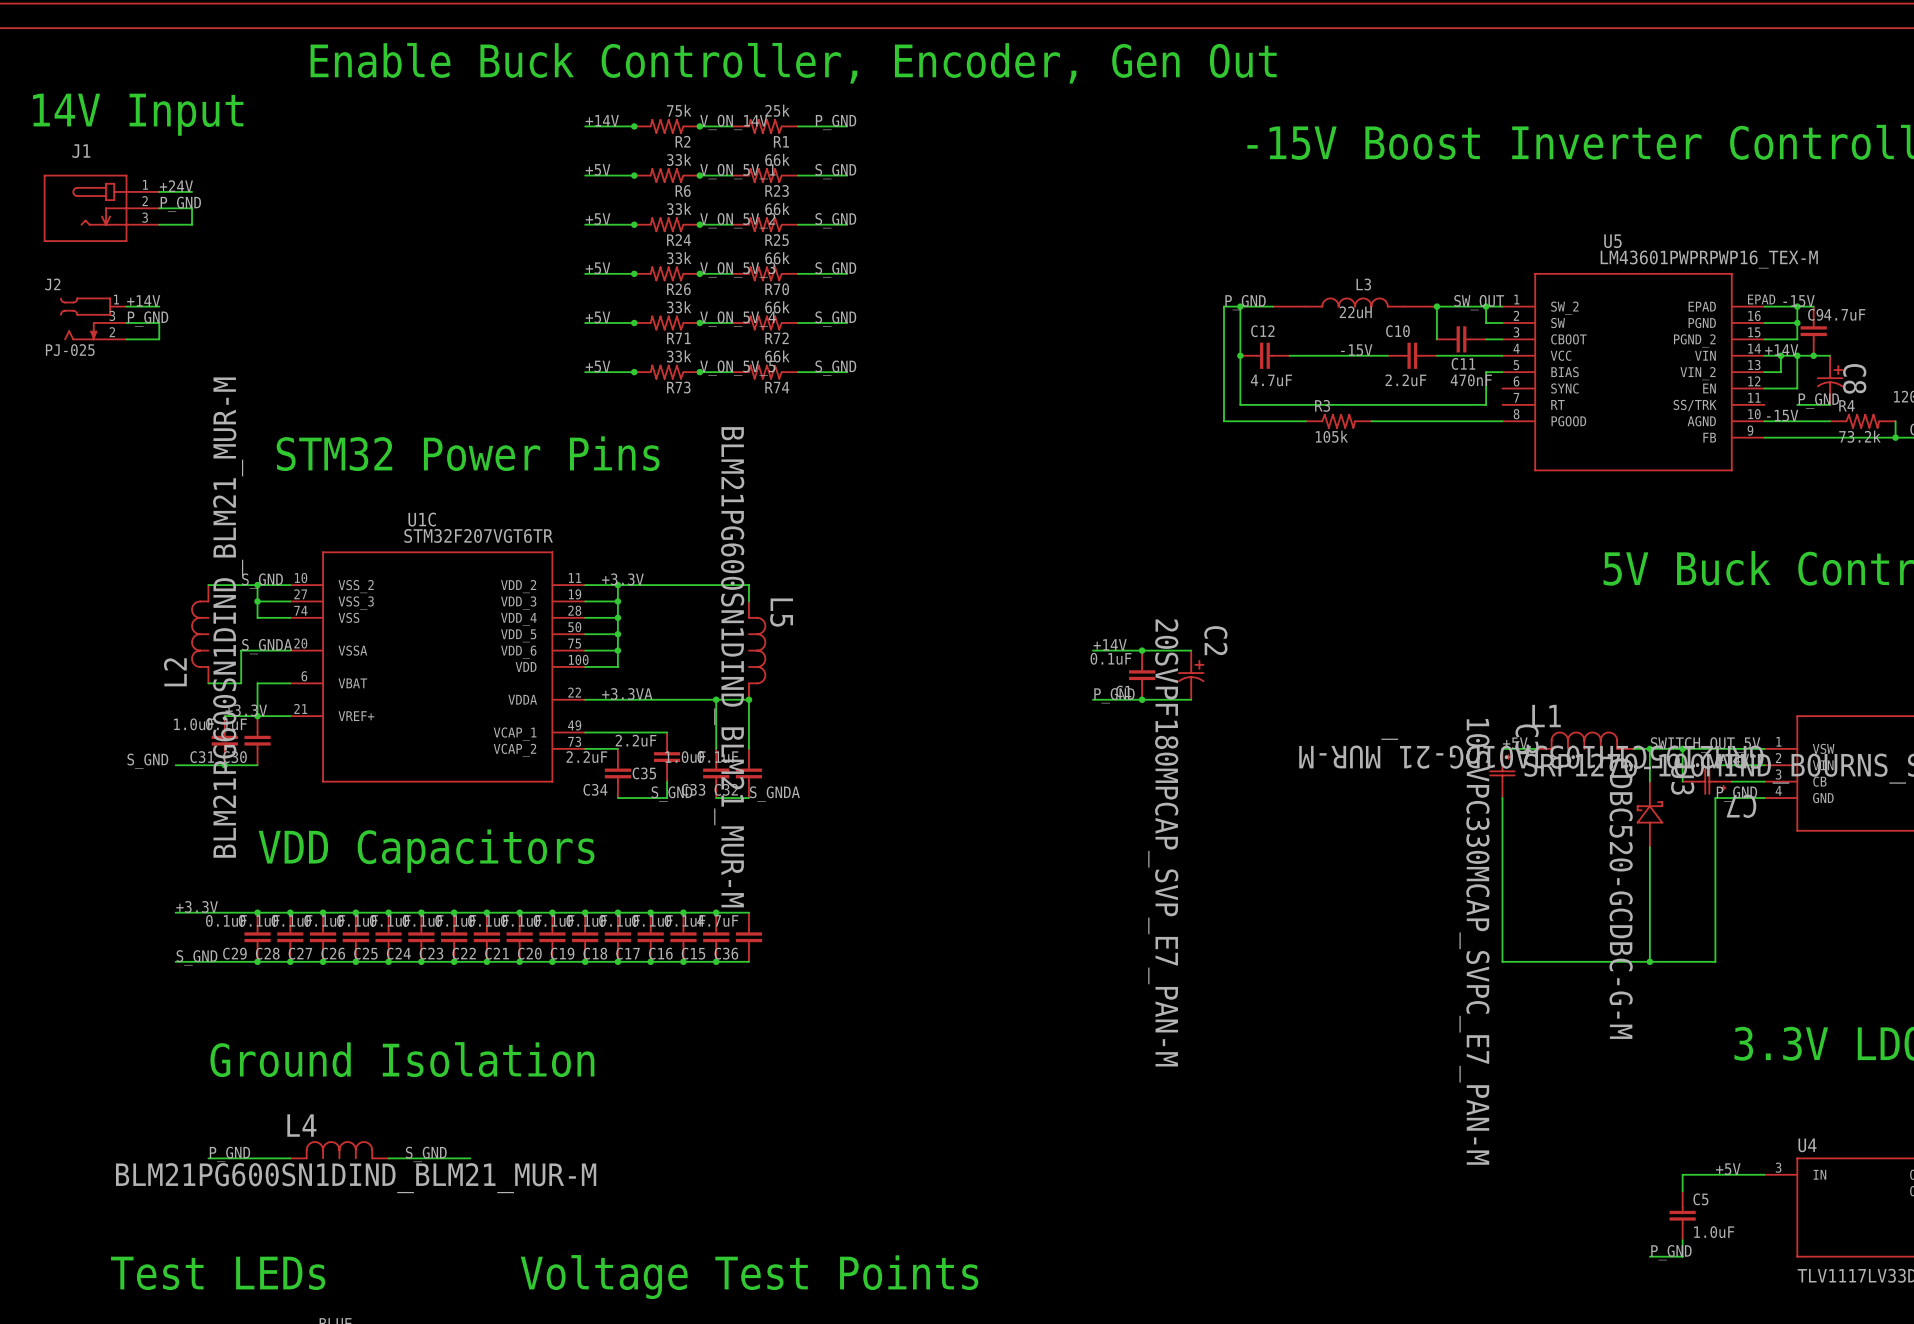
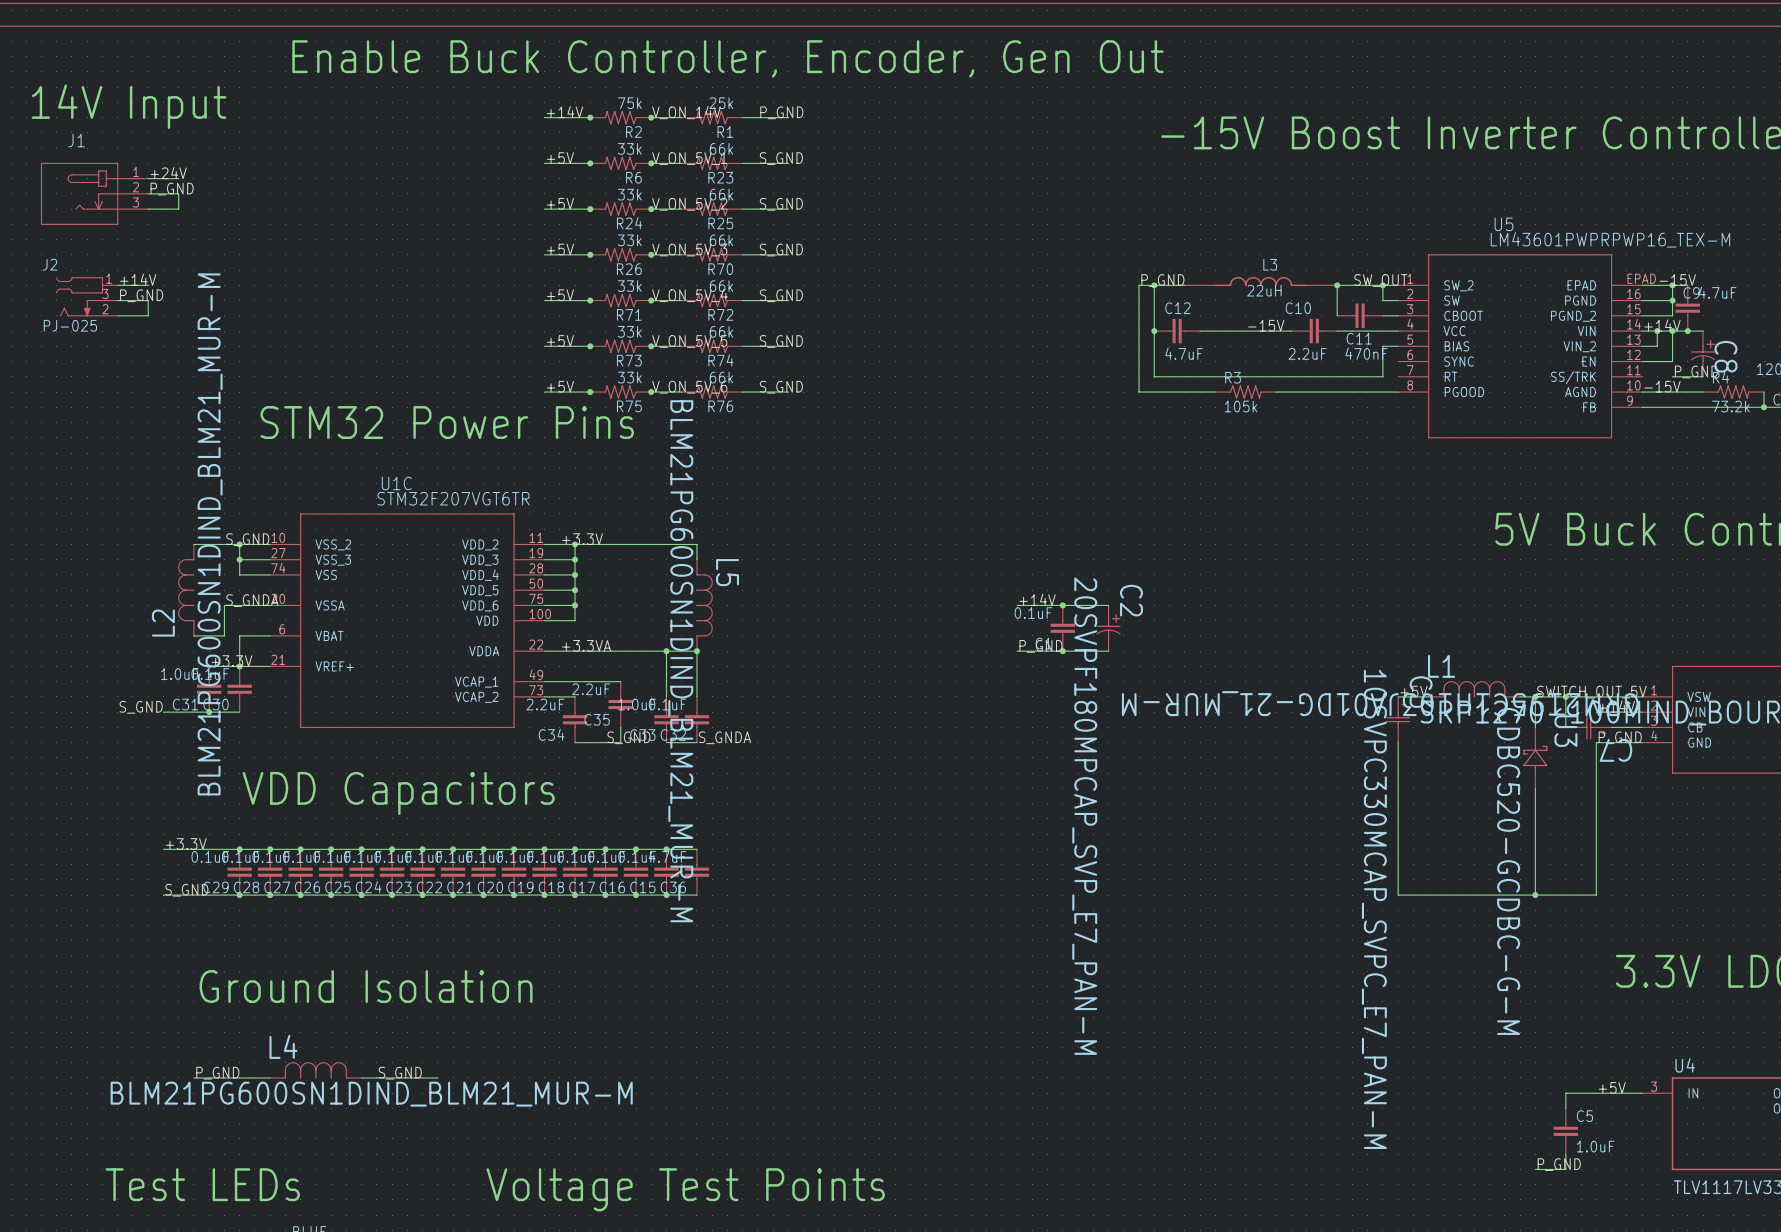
label: none -> +5V (560, 386)
label: none -> V_ON_5V_6 (689, 387)
label: none -> S_GND (781, 387)
wire: none -> (544, 392) (590, 392)
junction: none -> (590, 392)
R75: none -> 33k (620, 392)
wire: none -> (651, 392) (681, 392)
junction: none -> (651, 392)
R76: none -> 66k (712, 392)
wire: none -> (742, 392) (788, 392)

